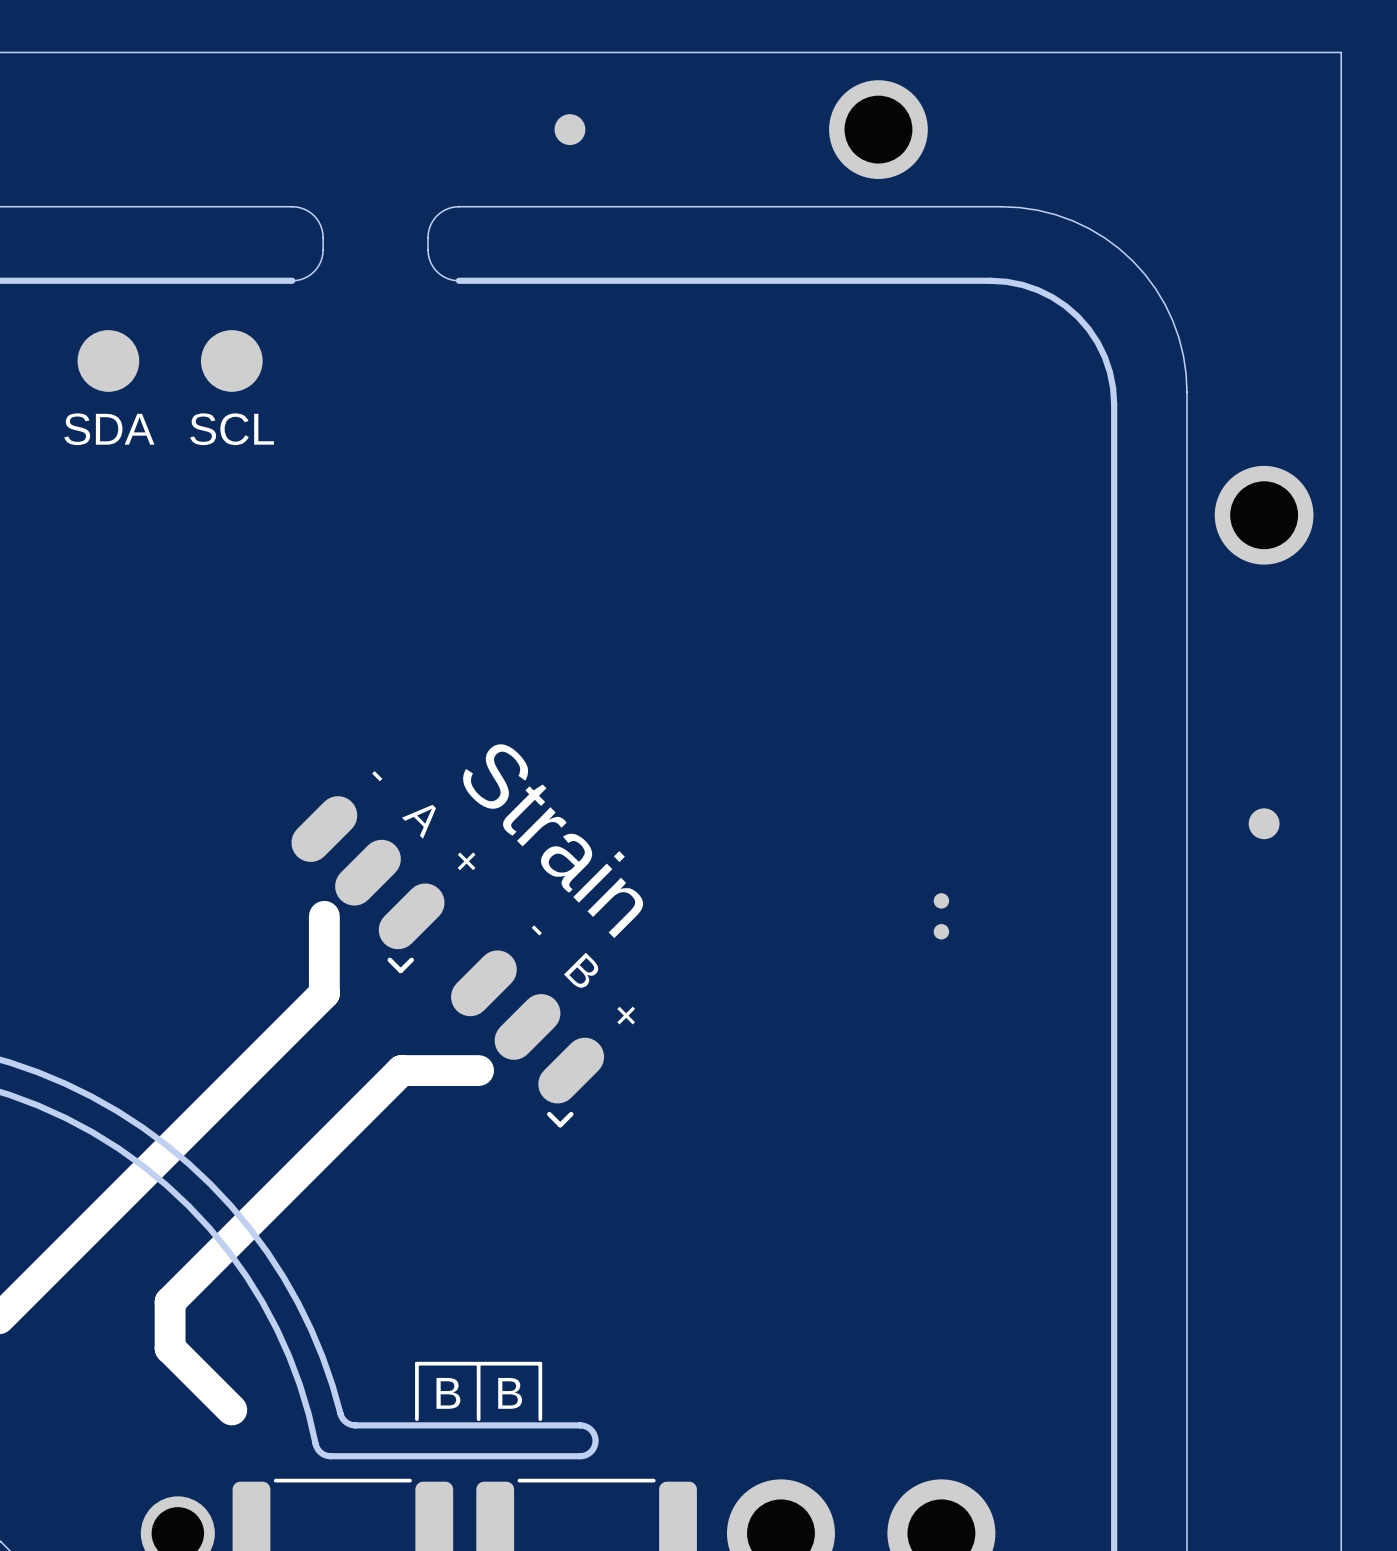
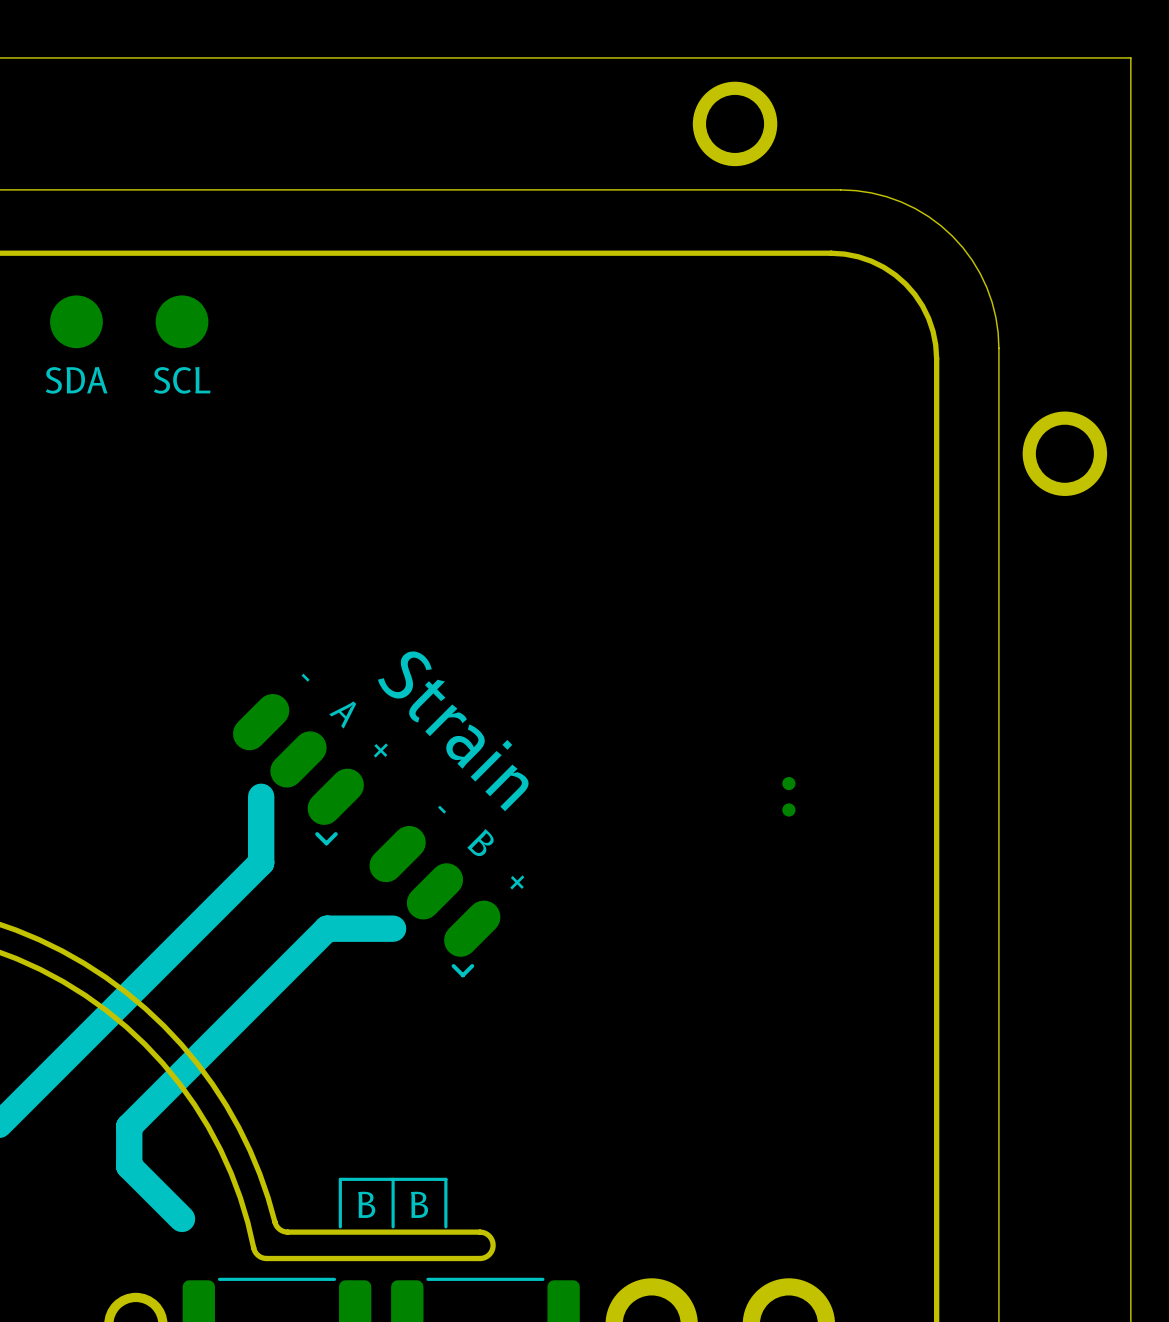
part: (569, 129) -> none
board edge: (292, 206) (304, 209) (314, 215) (320, 225) (323, 237) (322, 257) (316, 268) (304, 278) (292, 280) -> (376, 253) (233, 253)
board edge: (458, 206) (445, 209) (437, 215) (431, 224) (428, 237) (429, 257) (434, 268) (447, 278) (458, 280) -> (376, 189) (233, 189)
part: (1264, 823) -> none

